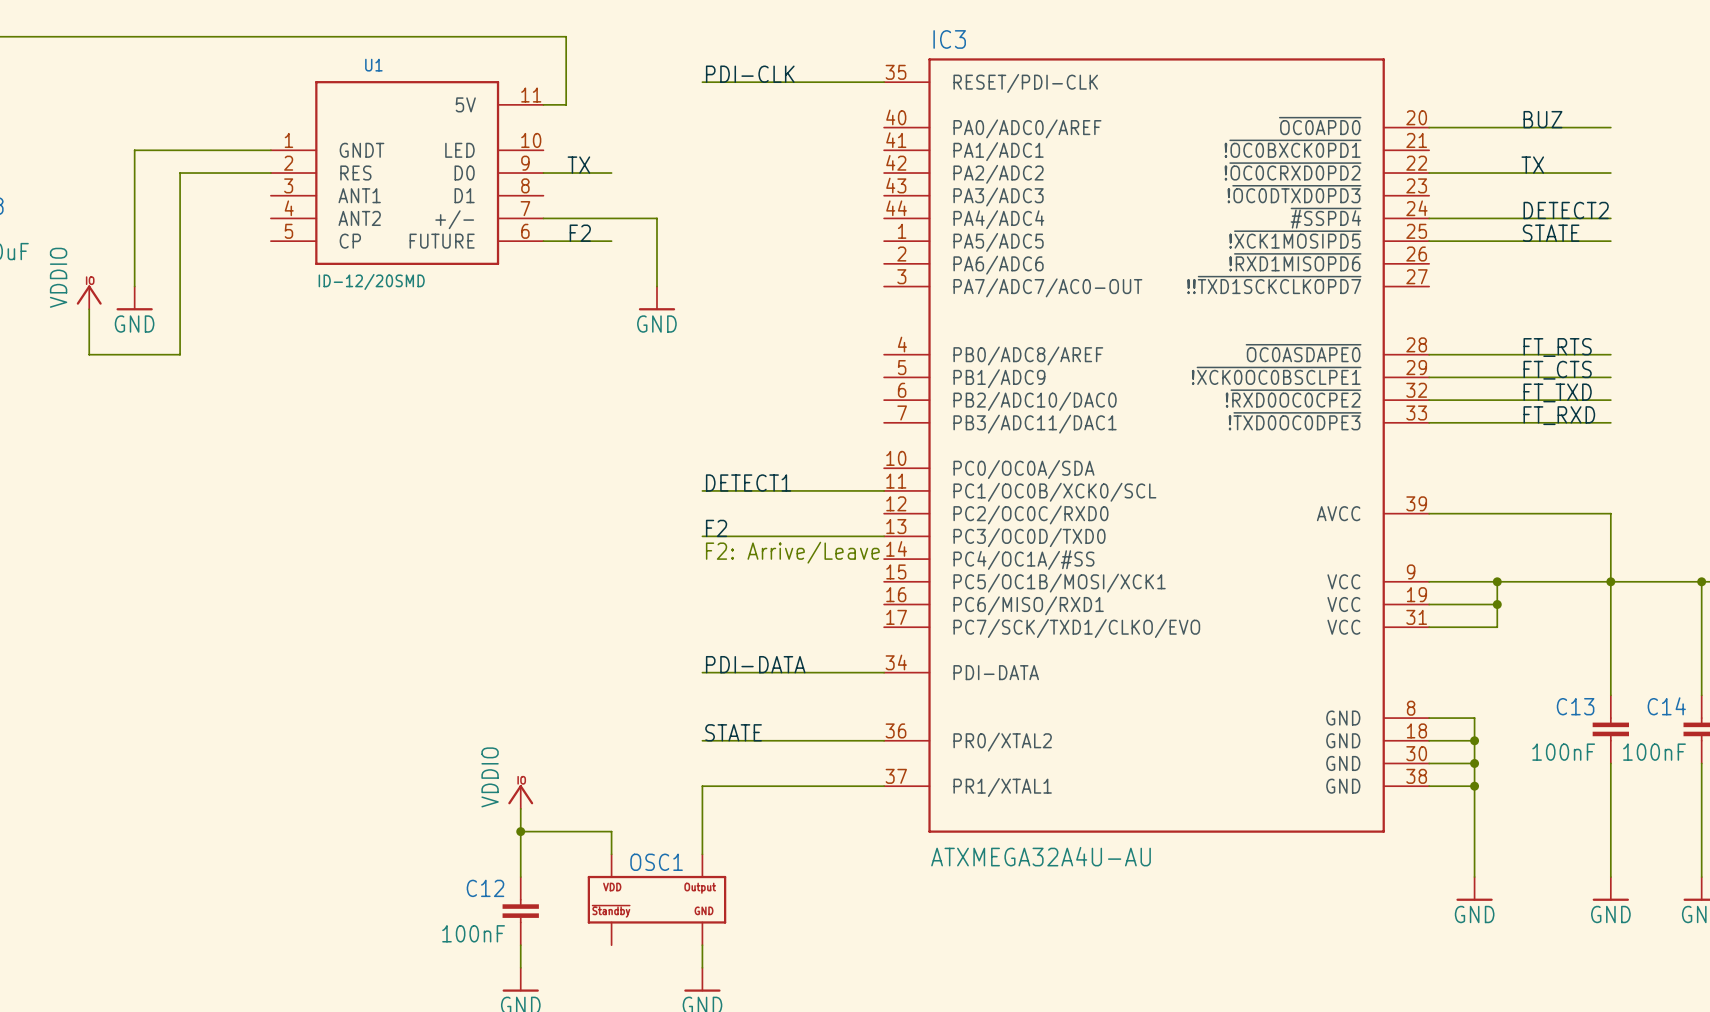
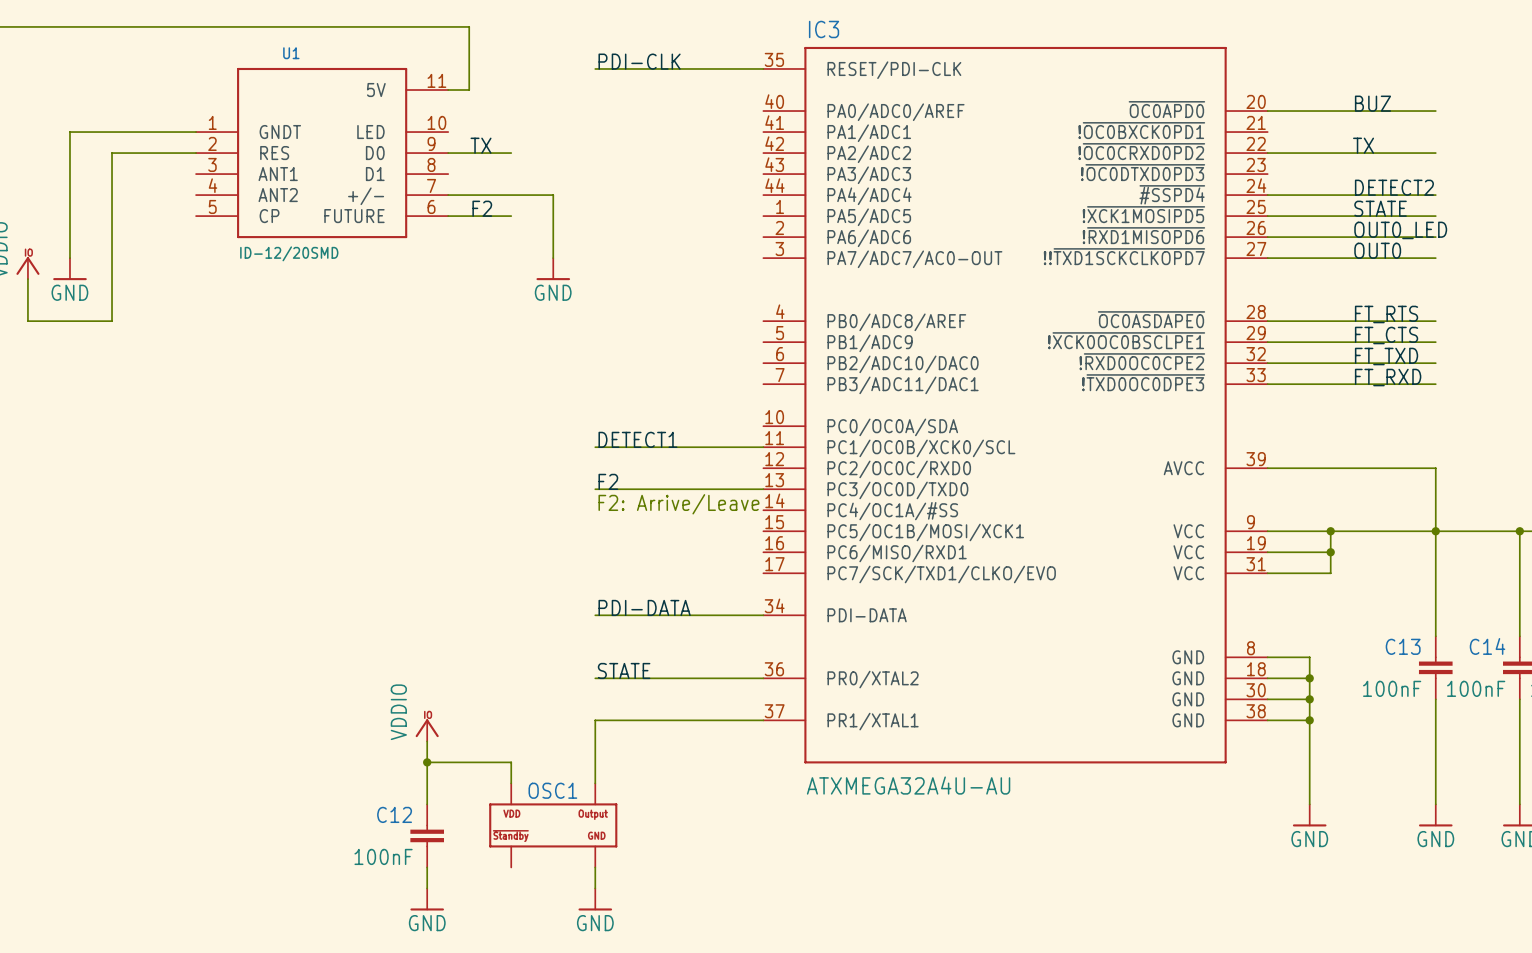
label: none -> OUT0_LED (1400, 230)
wire: none -> (1267, 237) (1435, 237)
label: none -> OUT0 (1377, 250)
wire: none -> (1267, 258) (1435, 258)

